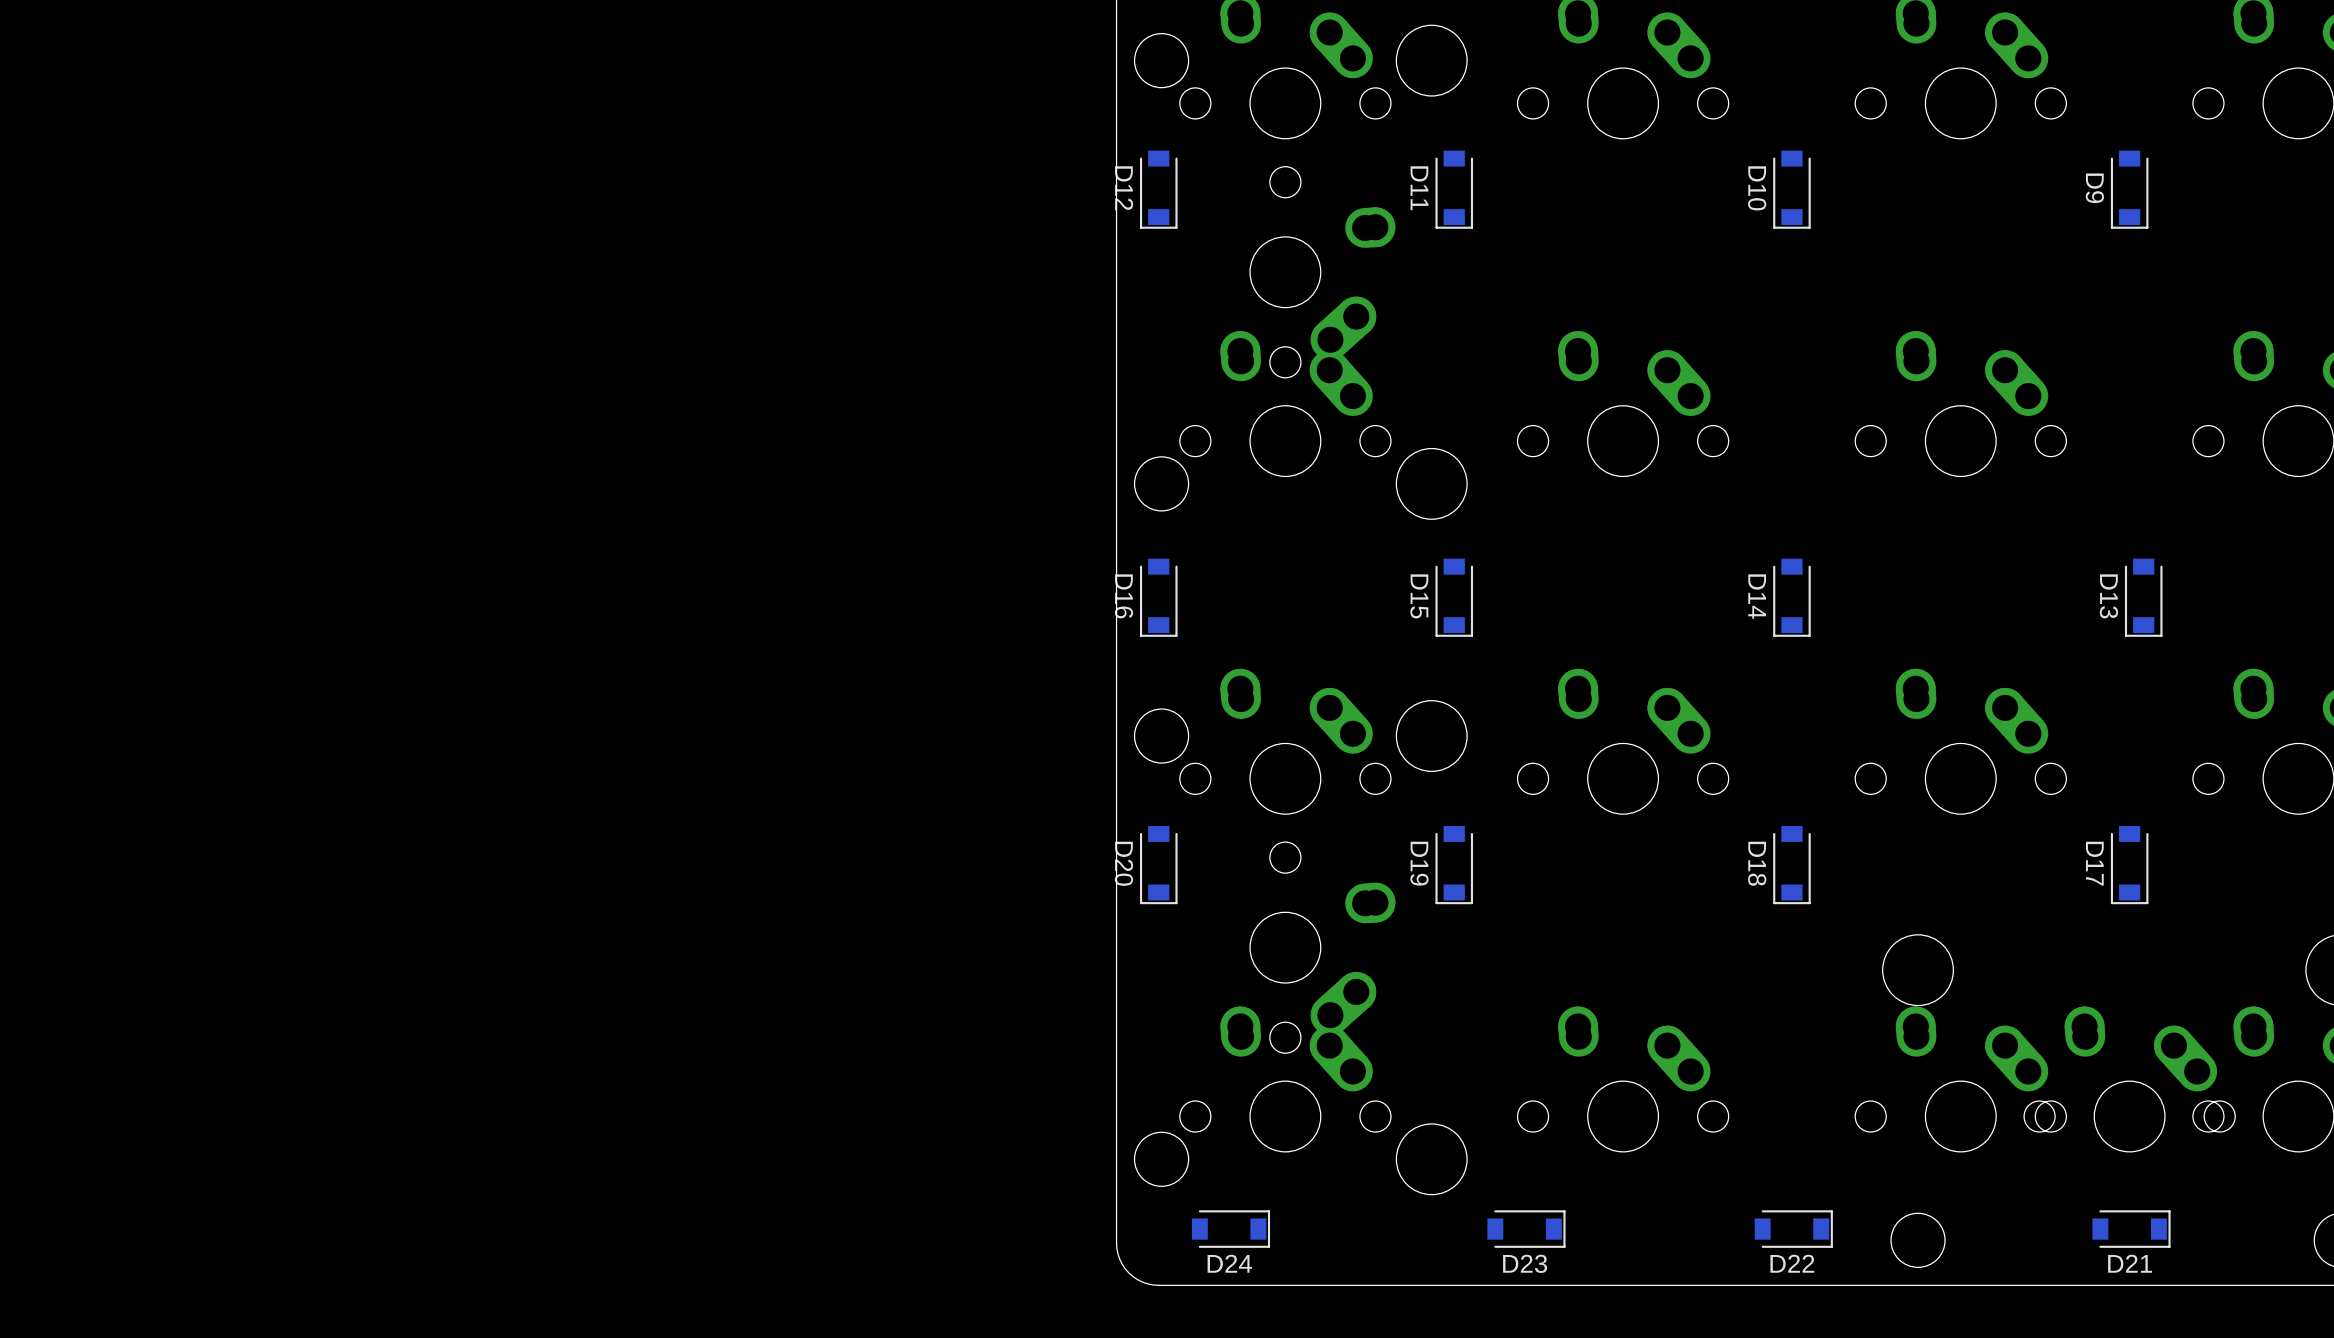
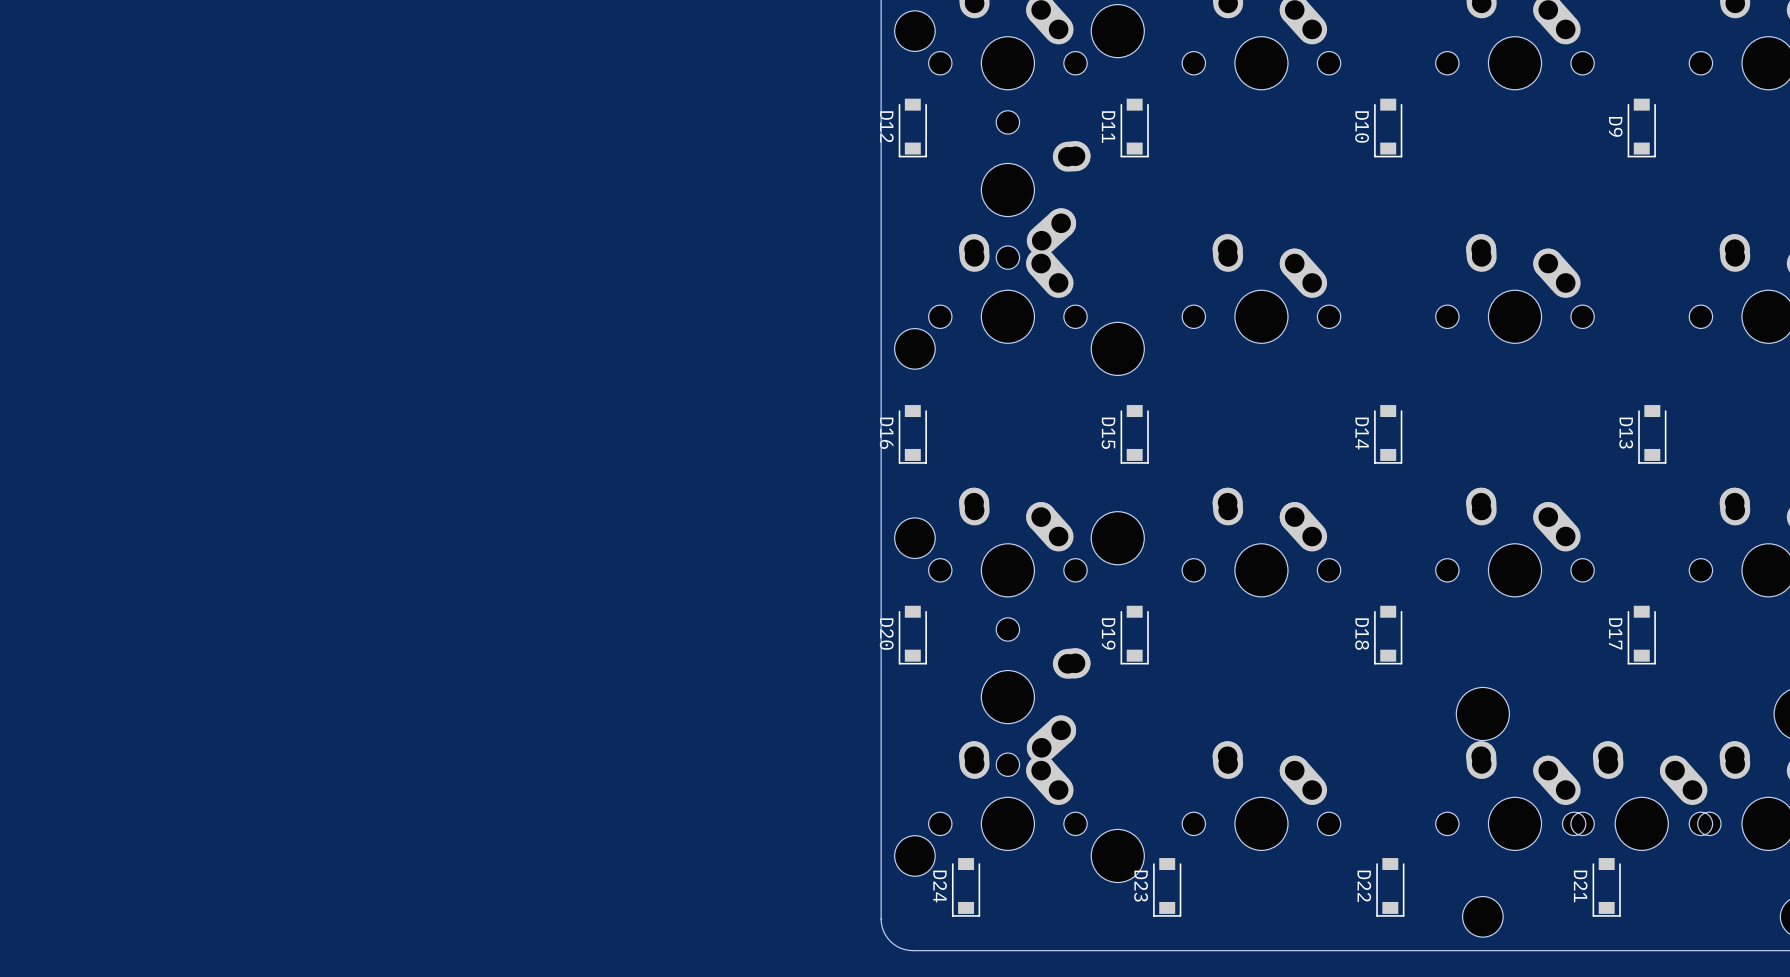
D24 rotation: 0° (1230, 1229) -> 90° clockwise (966, 887)
D23 rotation: 0° (1526, 1229) -> 90° clockwise (1167, 887)
D22 rotation: 0° (1793, 1229) -> 90° clockwise (1390, 887)
D21 rotation: 0° (2131, 1229) -> 90° clockwise (1606, 887)
D21 position: (2131, 1229) -> (1606, 887)

